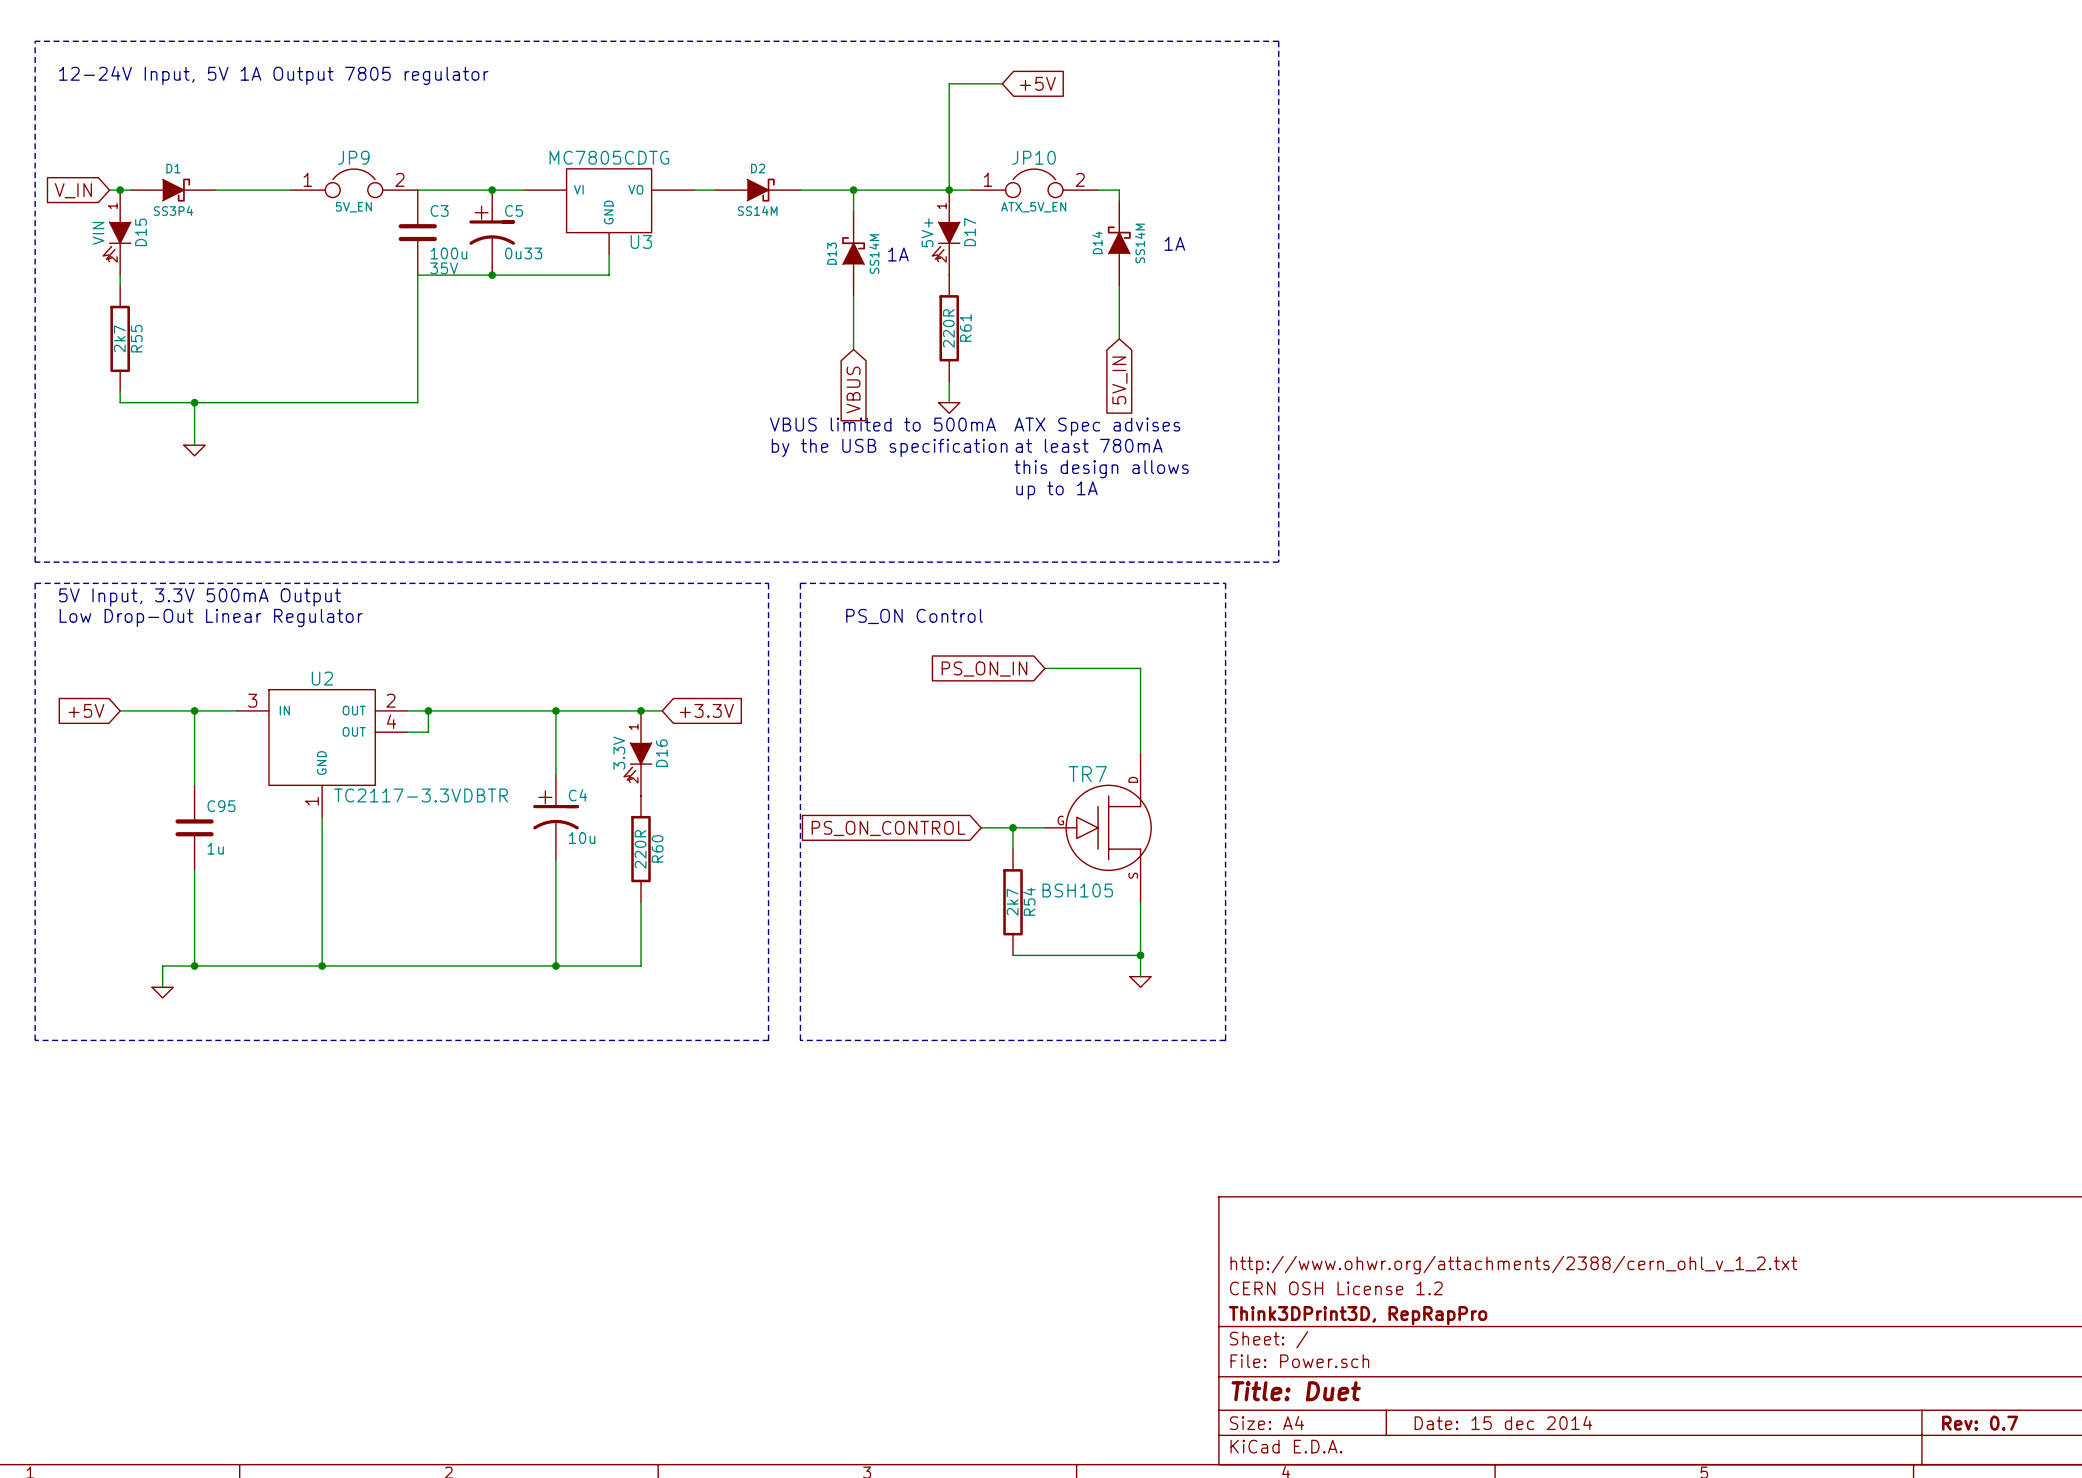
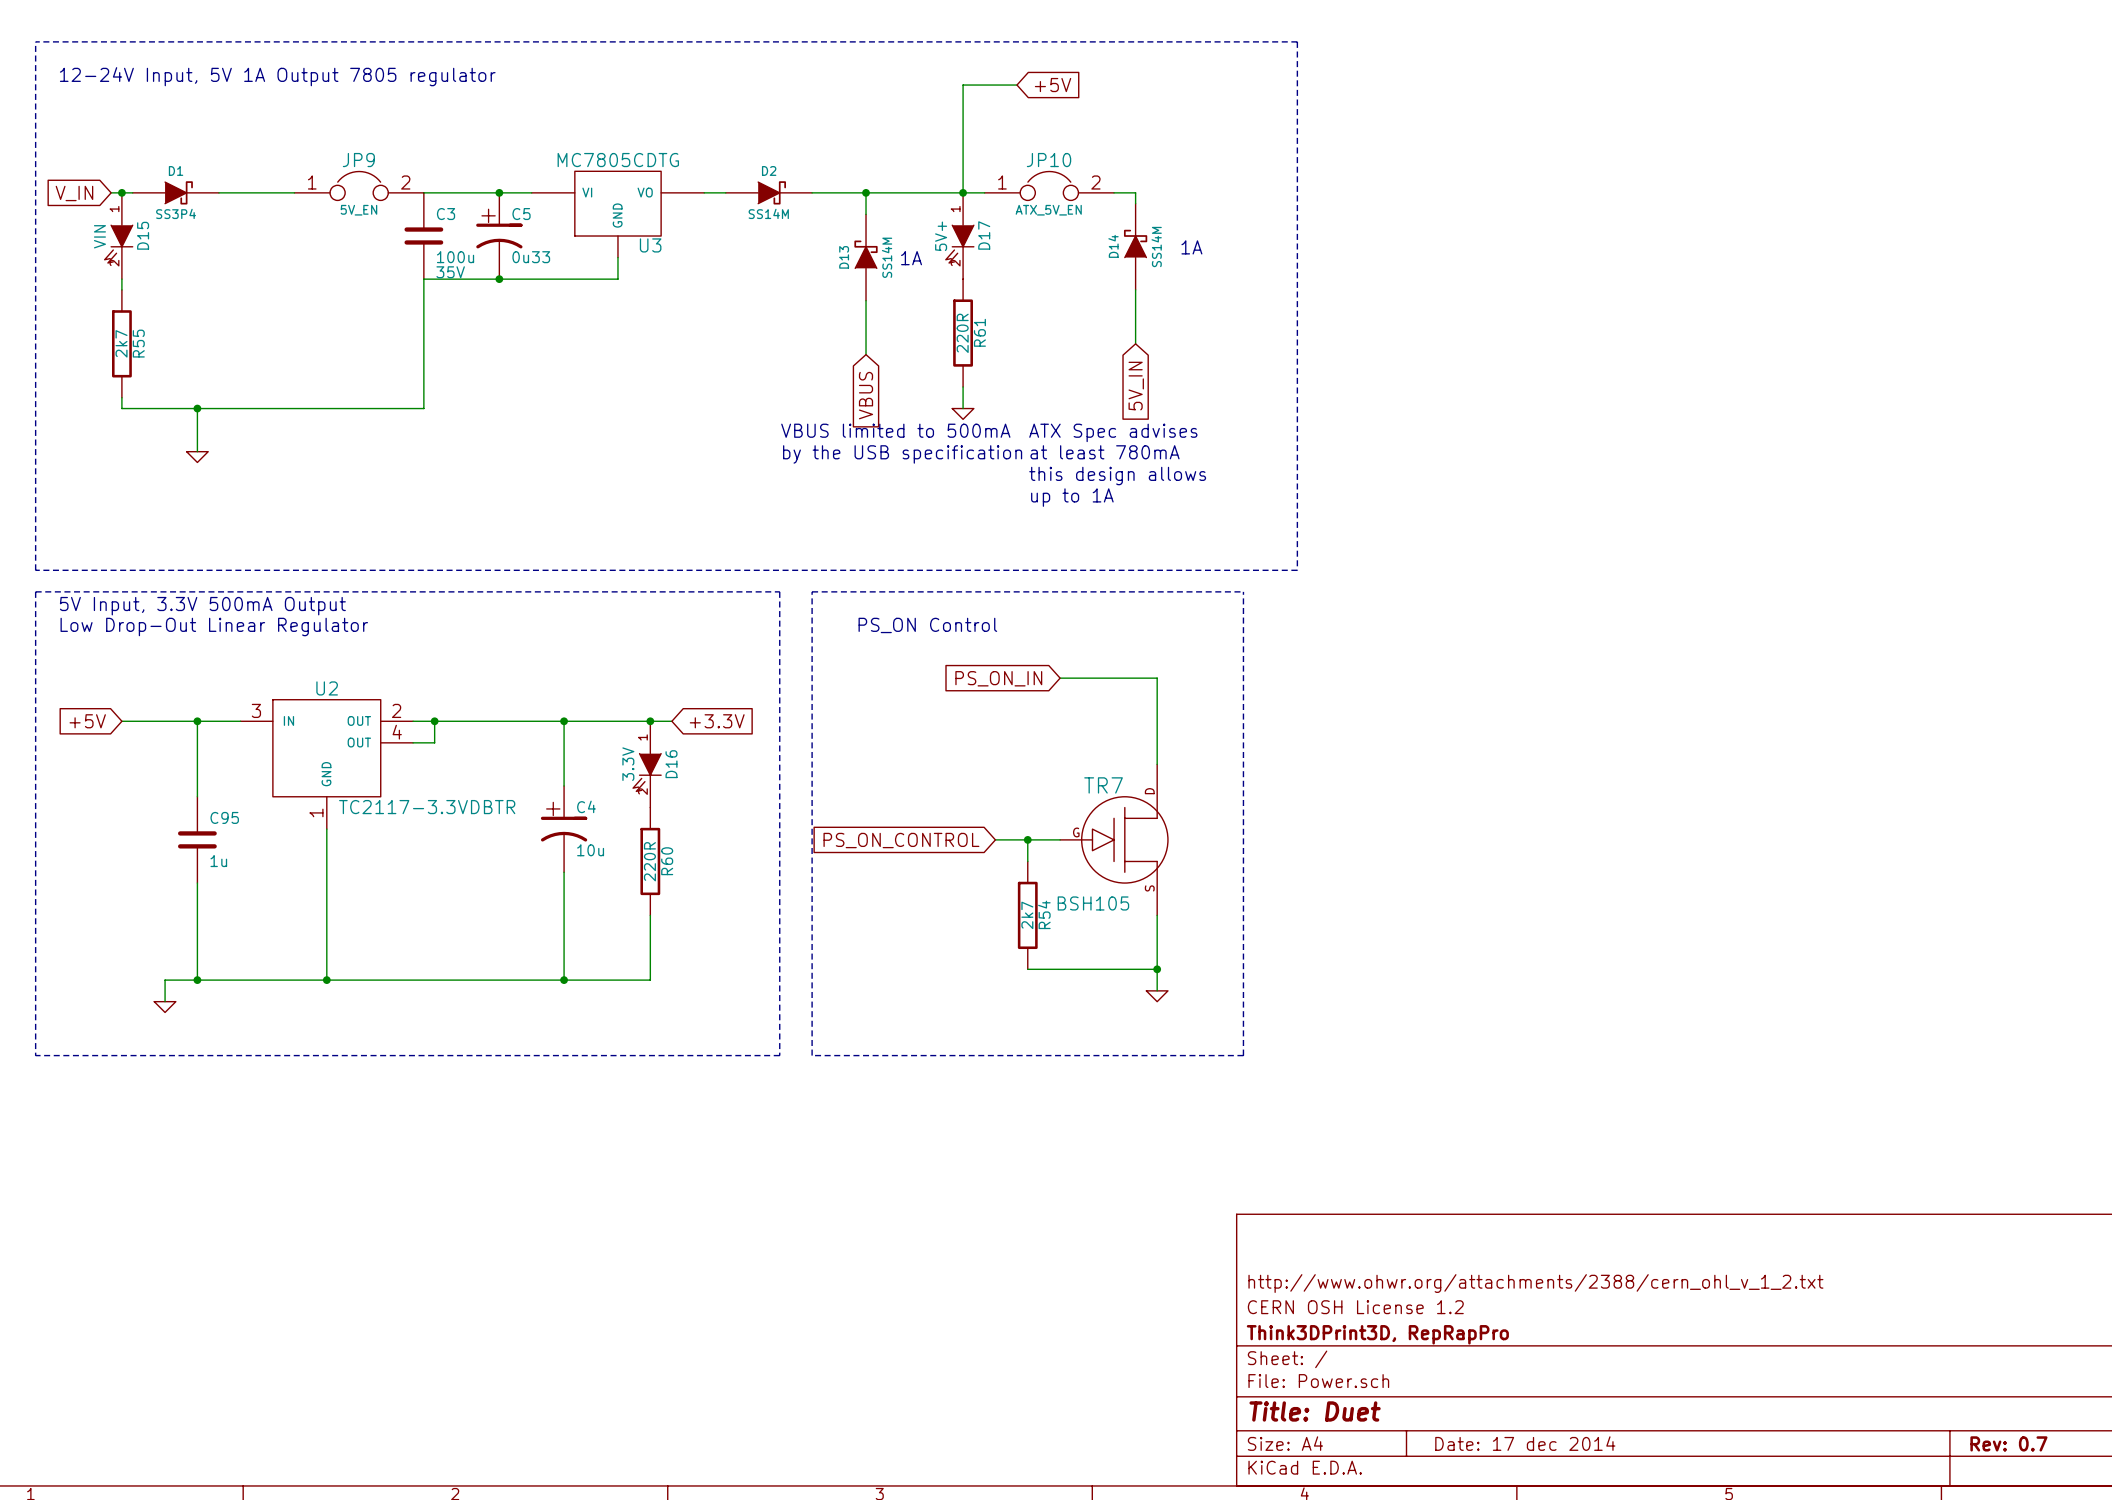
title block: Date: 15 dec 2014 (1503, 1422) -> Date: 17 dec 2014 (1525, 1443)

